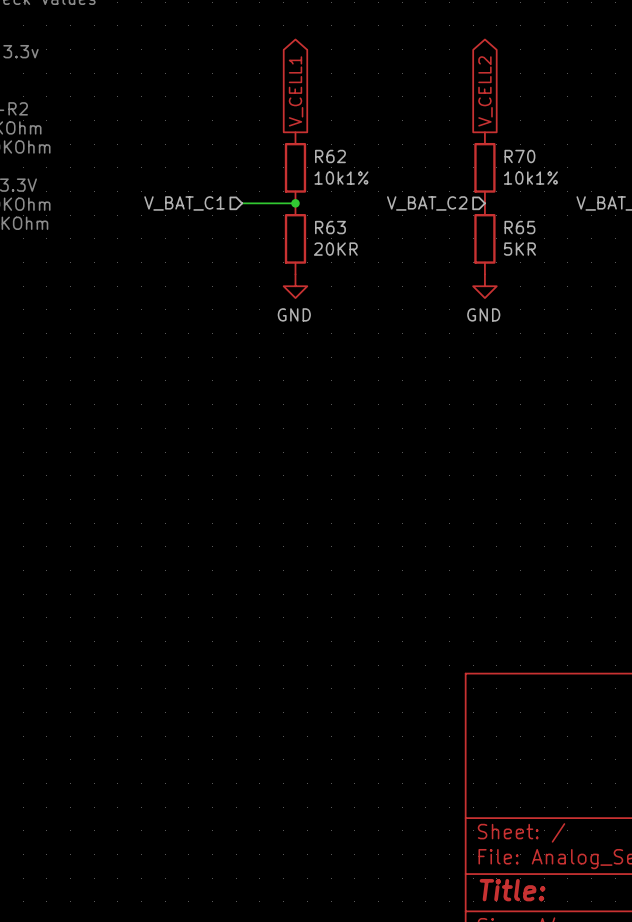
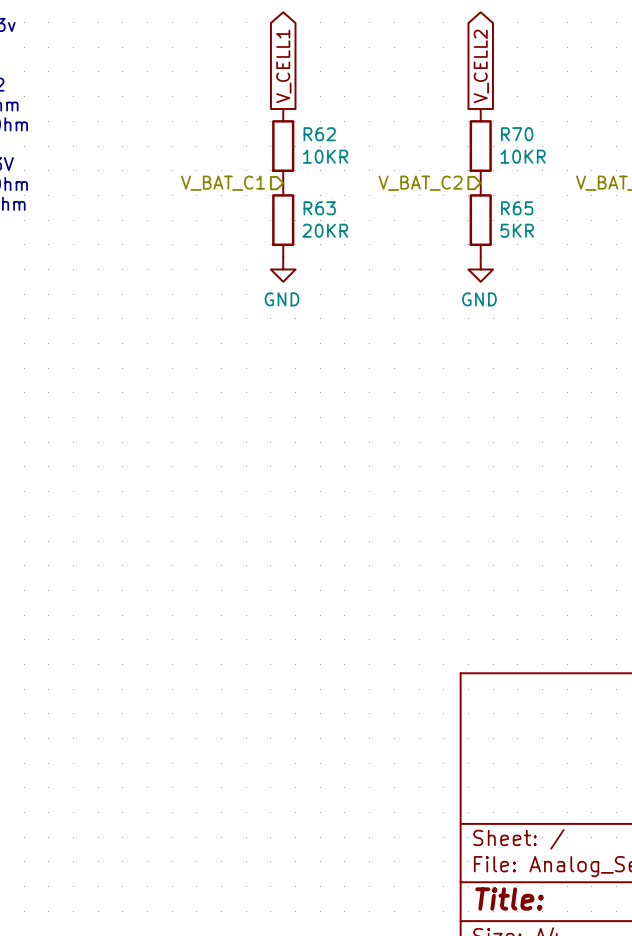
R62 value: 10k1% (341, 178) -> 10KR (325, 156)
R70 value: 10k1% (530, 178) -> 10KR (523, 156)
hierarchical label position: V_BAT_C1 (184, 203) -> V_BAT_C1 (223, 183)
wire: (242, 203) (295, 203) -> none
junction: (295, 203) -> none

